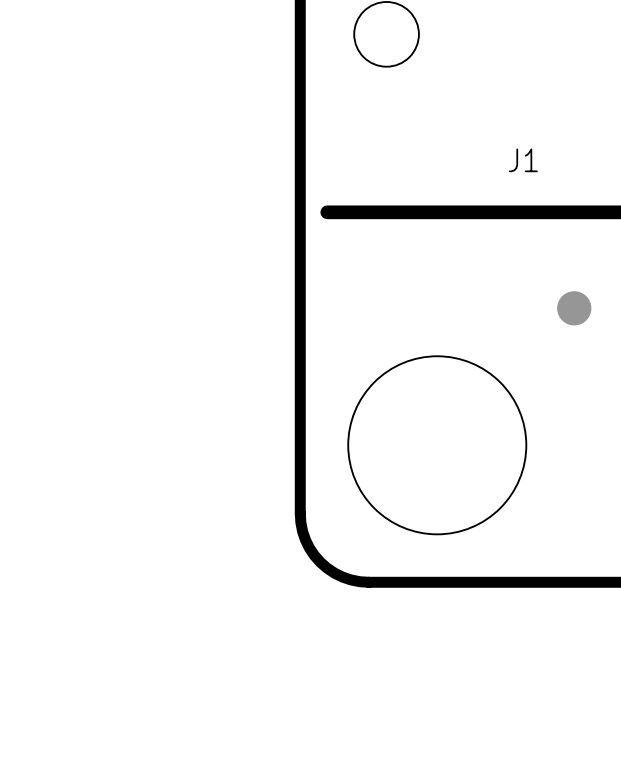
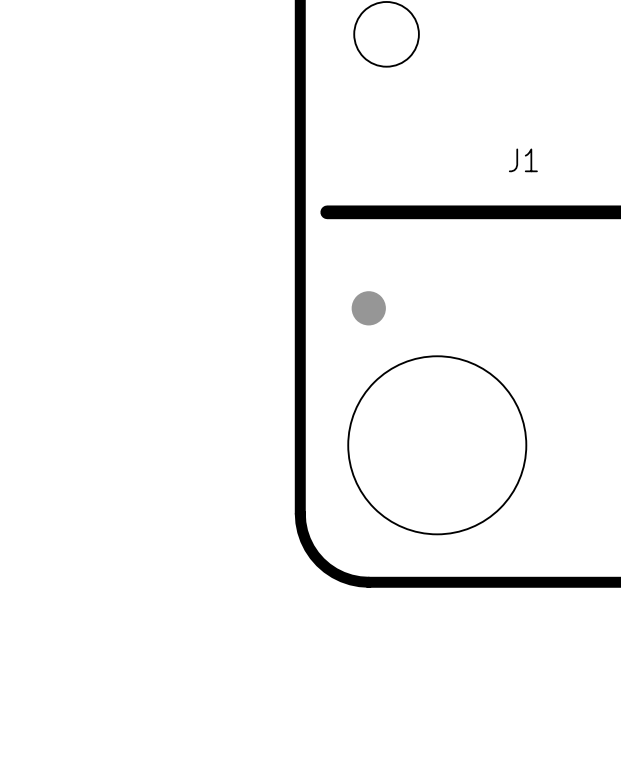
part position: (574, 308) -> (368, 308)

